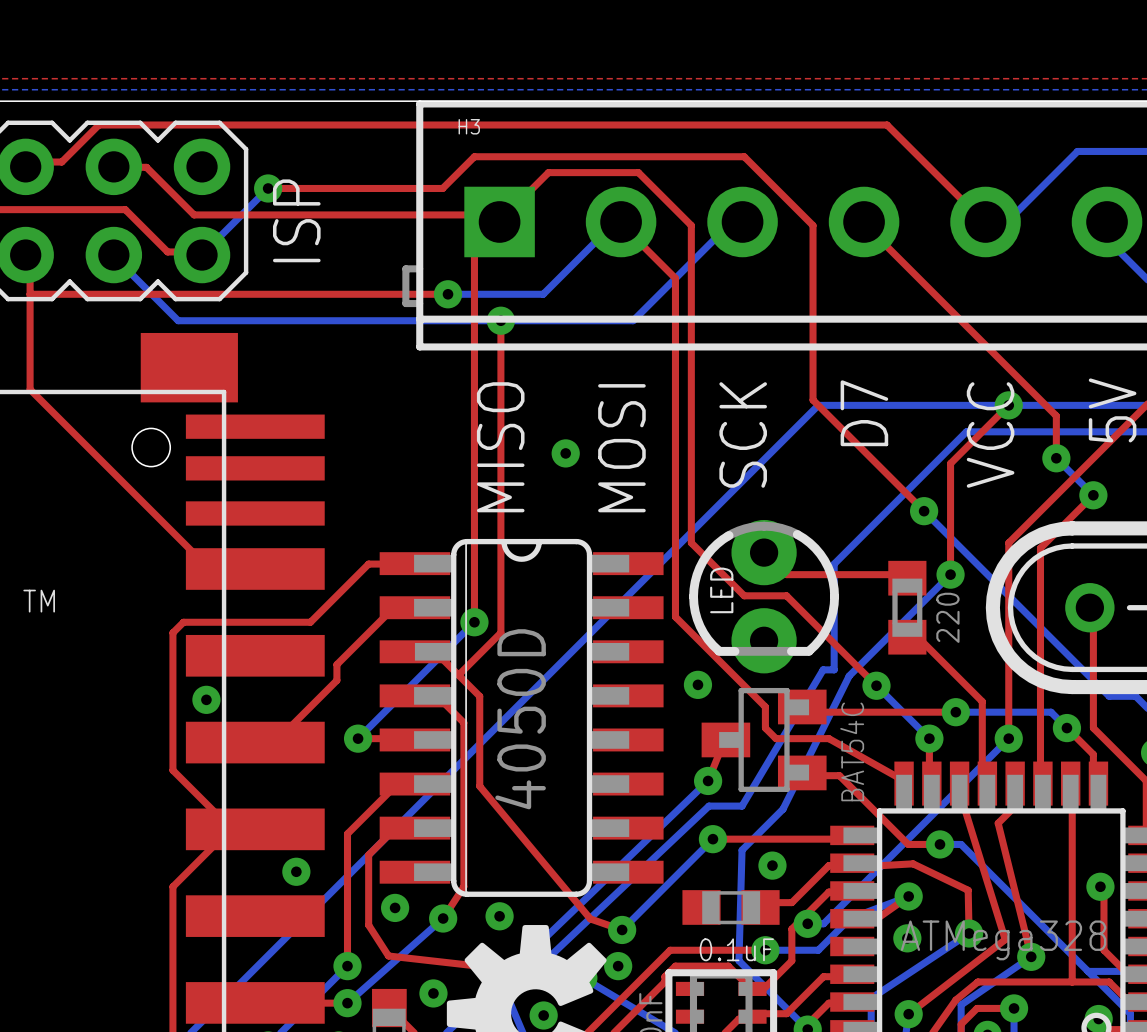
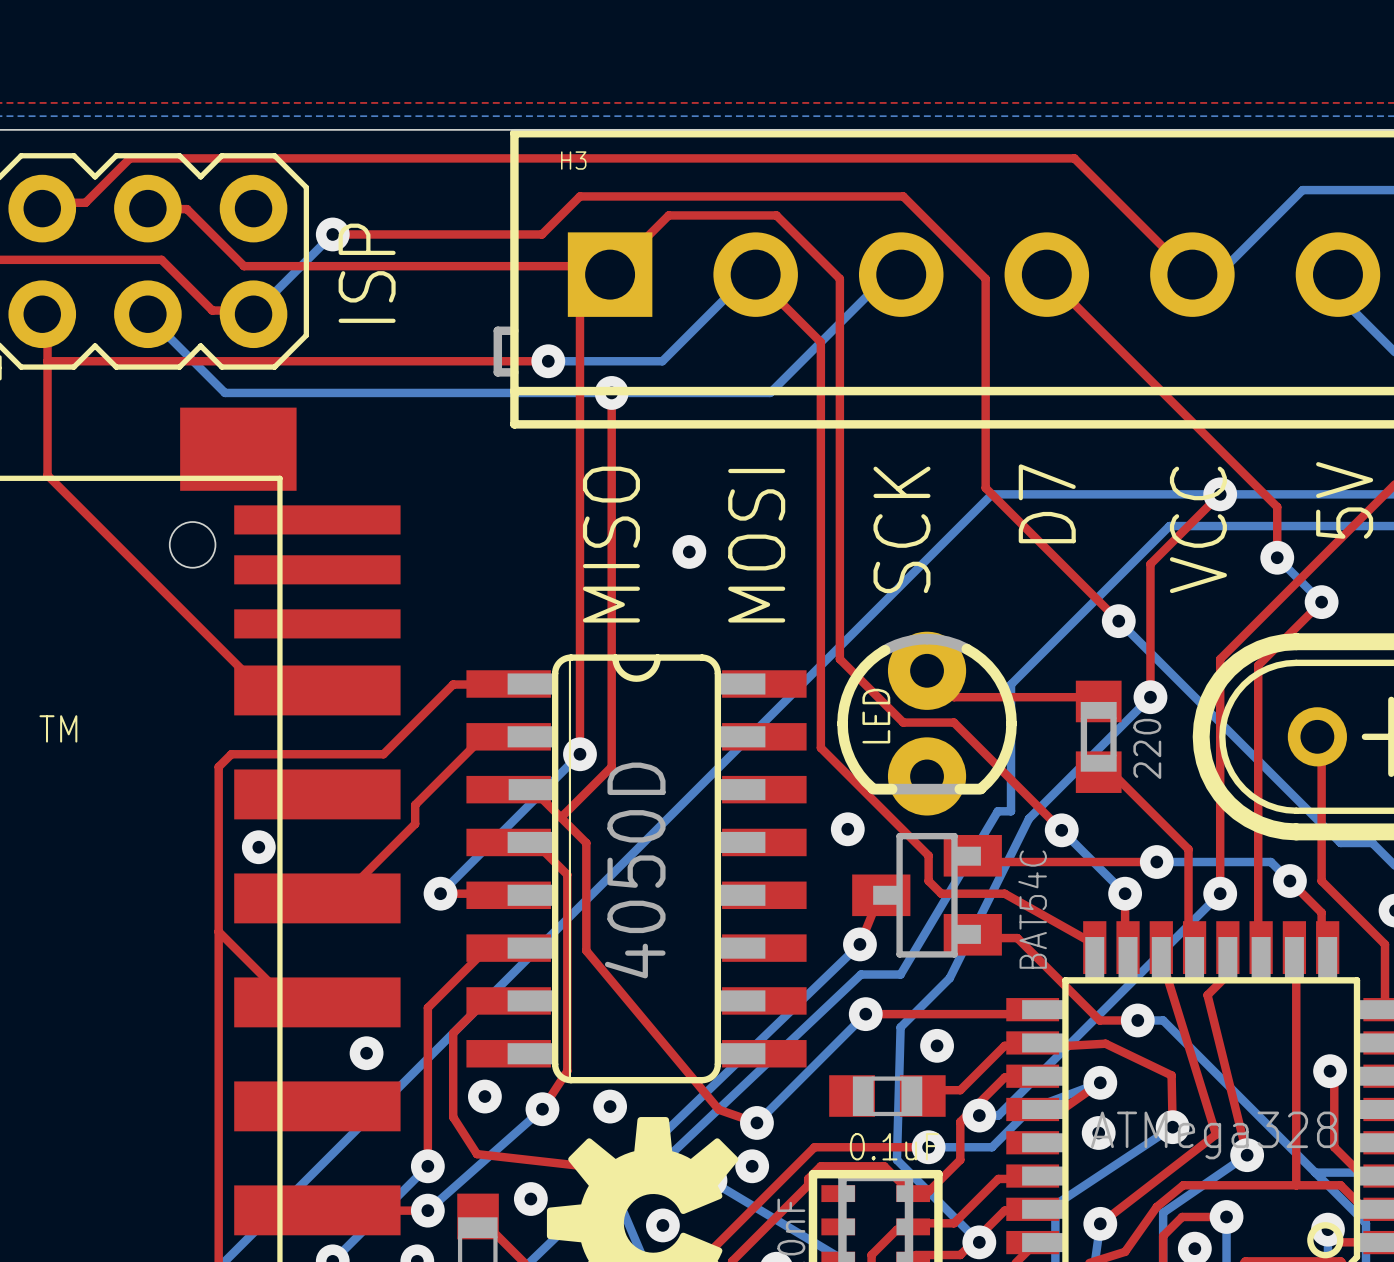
top track: (255, 829) (231, 828) (172, 886) -> (218, 931) (218, 1071)

